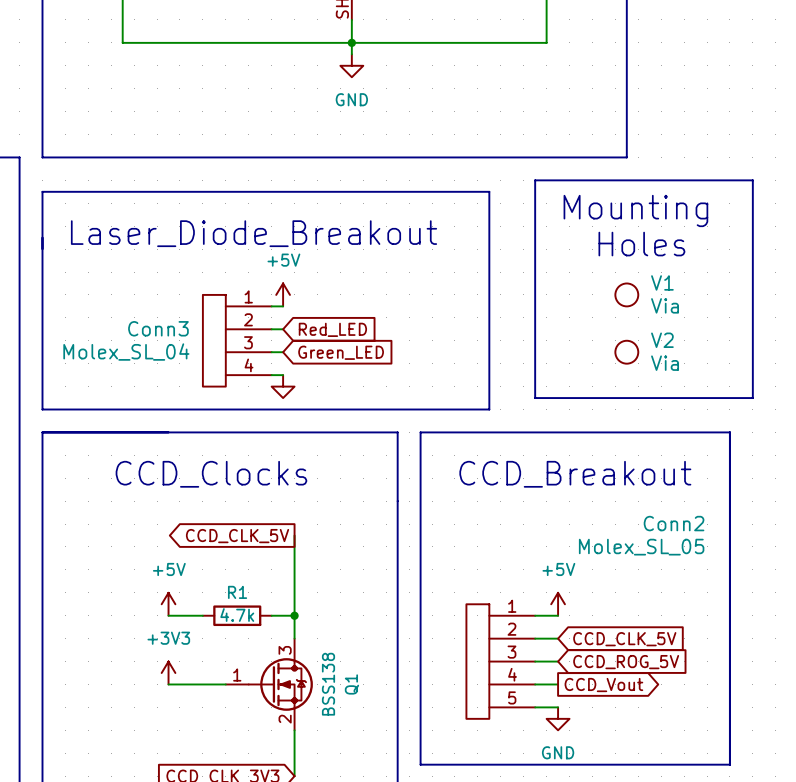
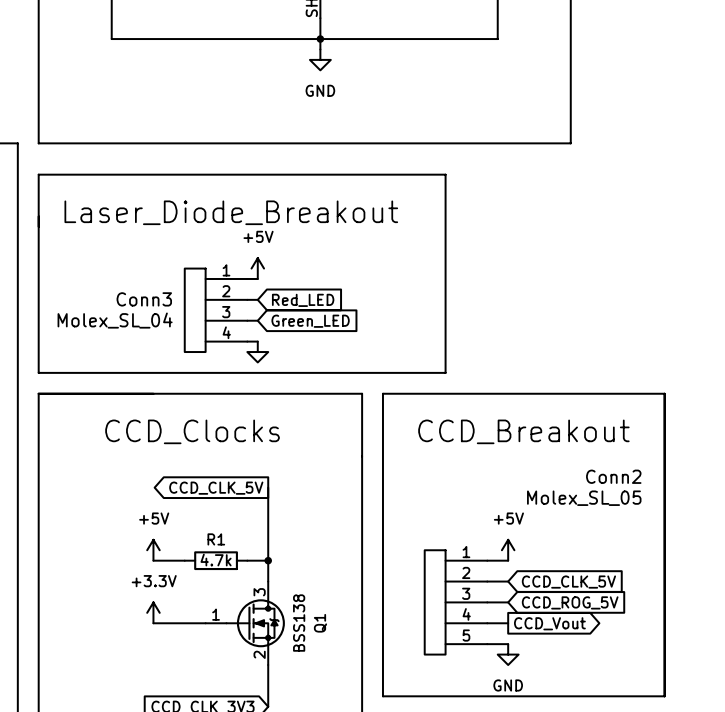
line: (535, 180) (535, 398) (752, 398) (752, 180) (535, 180) -> none
text: Mounting (635, 210) -> none
text: Holes (641, 244) -> none
V1: Via (626, 294) -> none
V2: Via (626, 352) -> none
power symbol: +3V3 (168, 673) -> +3.3V (153, 612)

